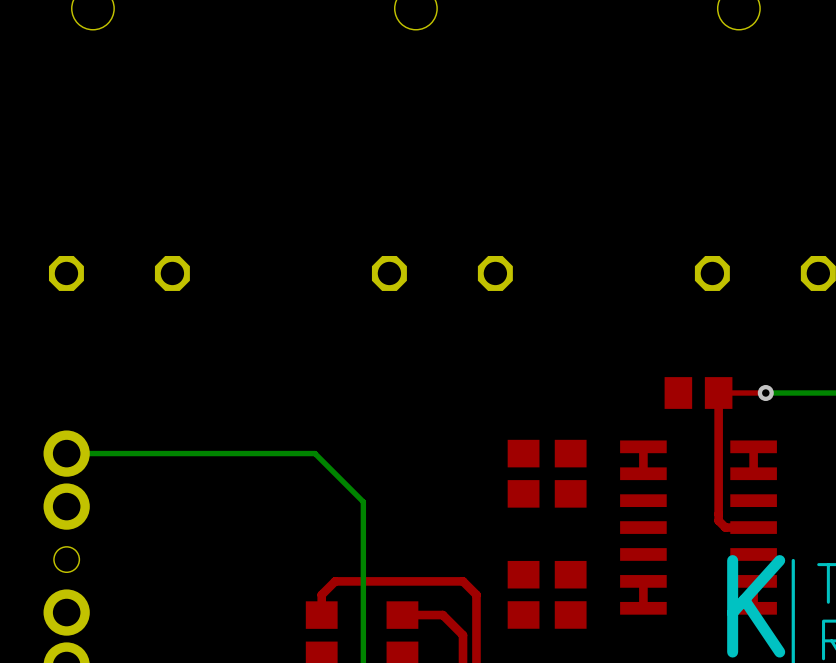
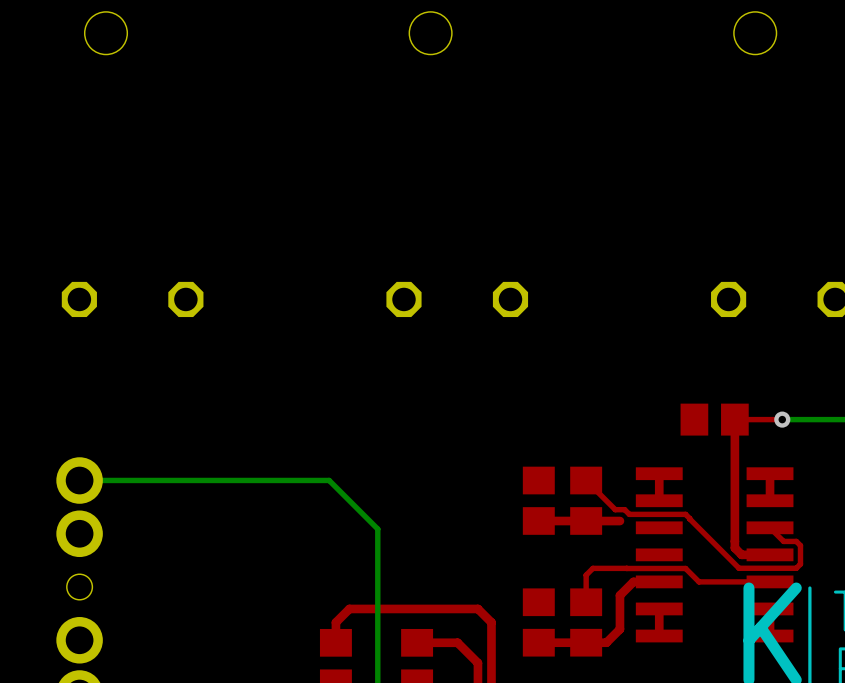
top track: none -> (586, 480) (615, 509) (624, 509) (629, 514) (685, 514) (739, 568) (796, 568) (800, 564) (800, 545) (796, 541) (783, 541) (770, 527)
top track: none -> (619, 521) (538, 520)
top track: none -> (626, 568) (592, 568) (586, 575) (586, 602)
top track: none -> (626, 568) (685, 568) (699, 581) (770, 581)
top track: none -> (659, 581) (633, 581) (619, 595) (619, 629) (606, 642) (538, 642)

